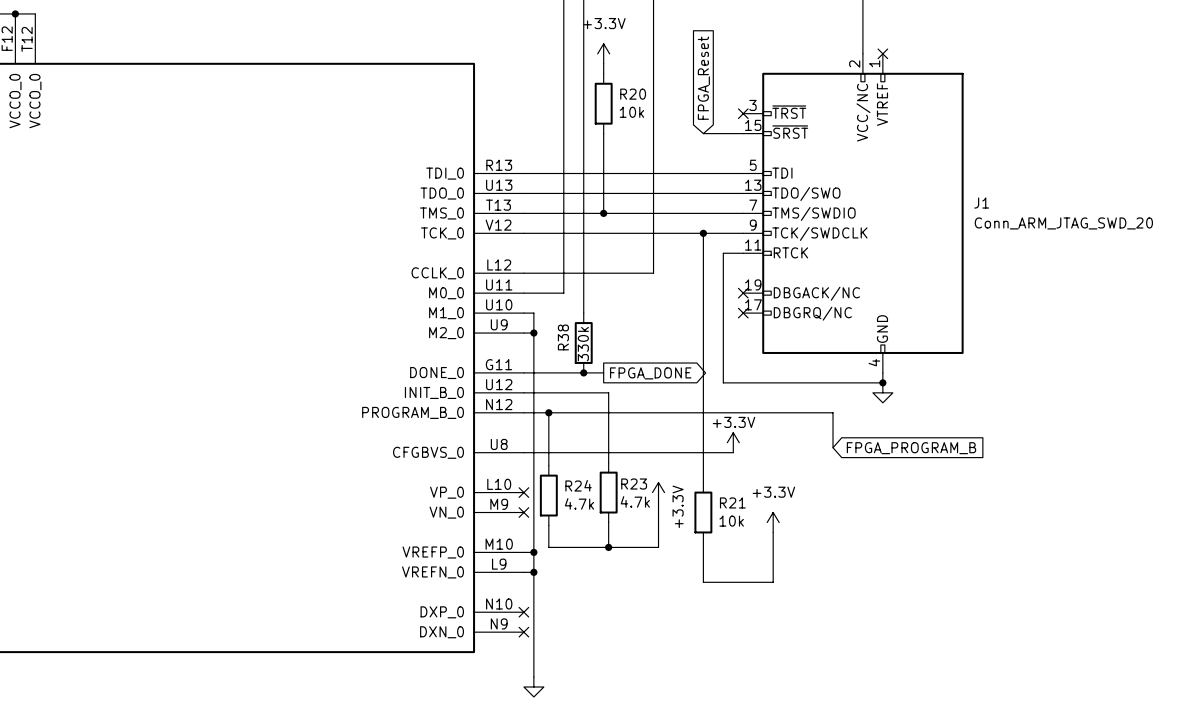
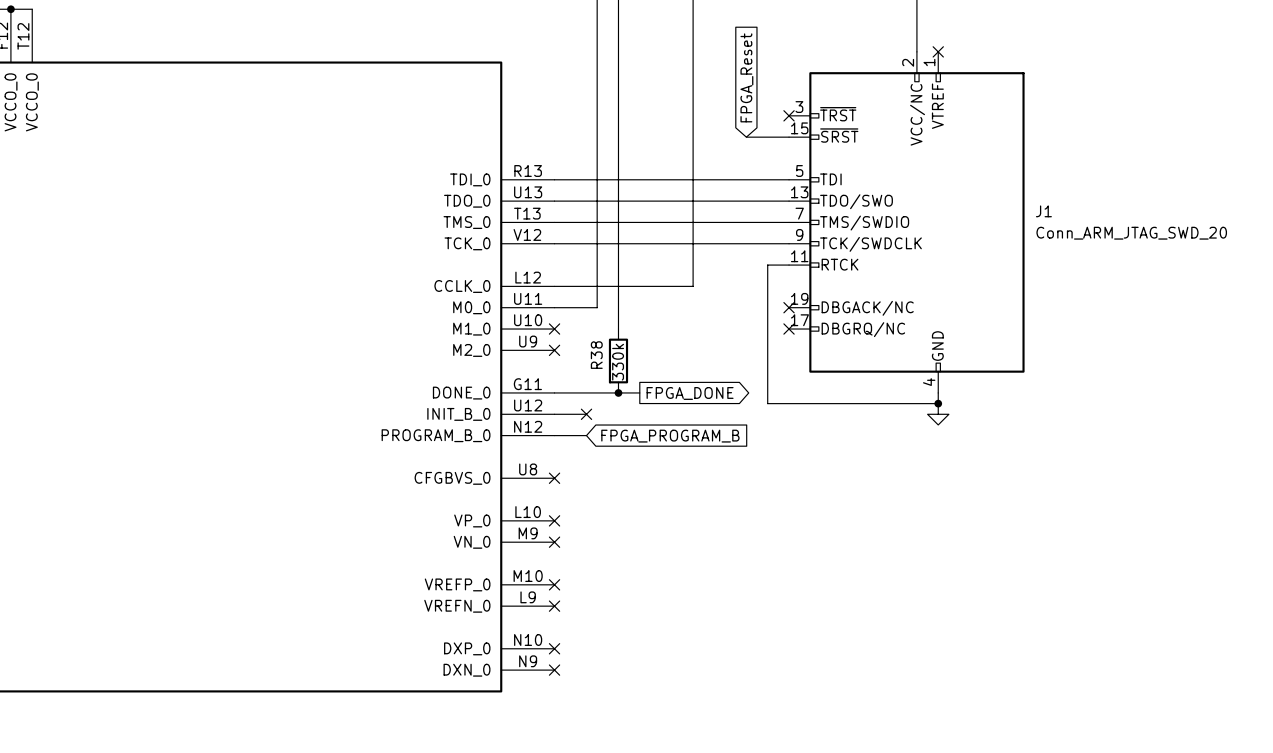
power symbol: +3.3V (603, 53) -> none
wire: (603, 63) (603, 73) -> none
R20: 10k (603, 103) -> none
wire: (603, 133) (603, 213) -> none
junction: (603, 213) -> none
wire: (703, 233) (703, 482) -> none
junction: (703, 233) -> none
wire: (523, 313) (533, 313) (533, 677) -> none
no-connect mark: none -> (554, 329)
wire: (523, 333) (533, 333) -> none
no-connect mark: none -> (554, 350)
junction: (533, 333) -> none
wire: (553, 392) (608, 392) (608, 462) -> none
no-connect mark: none -> (586, 414)
wire: (548, 412) (548, 465) -> none
junction: (548, 412) -> none
wire: (553, 412) (833, 412) (833, 447) -> none
global label: none -> FPGA_PROGRAM_B (670, 436)
power symbol: +3.3V (733, 442) -> none
global label: FPGA_PROGRAM_B (911, 448) -> none
wire: (523, 452) (733, 452) -> none
no-connect mark: none -> (554, 478)
R23: 4.7k (608, 492) -> none
power symbol: +3.3V (658, 492) -> none
R24: 4.7k (548, 495) -> none
wire: (658, 502) (658, 547) (548, 547) (548, 525) -> none
R21: 10k (703, 512) -> none
wire: (608, 522) (608, 547) -> none
power symbol: +3.3V (773, 522) -> none
wire: (773, 532) (773, 582) (703, 582) (703, 542) -> none
junction: (608, 547) -> none
wire: (523, 552) (533, 552) -> none
no-connect mark: none -> (554, 584)
junction: (533, 552) -> none
wire: (523, 572) (533, 572) -> none
no-connect mark: none -> (554, 606)
junction: (533, 572) -> none
power symbol: (533, 687) -> none

